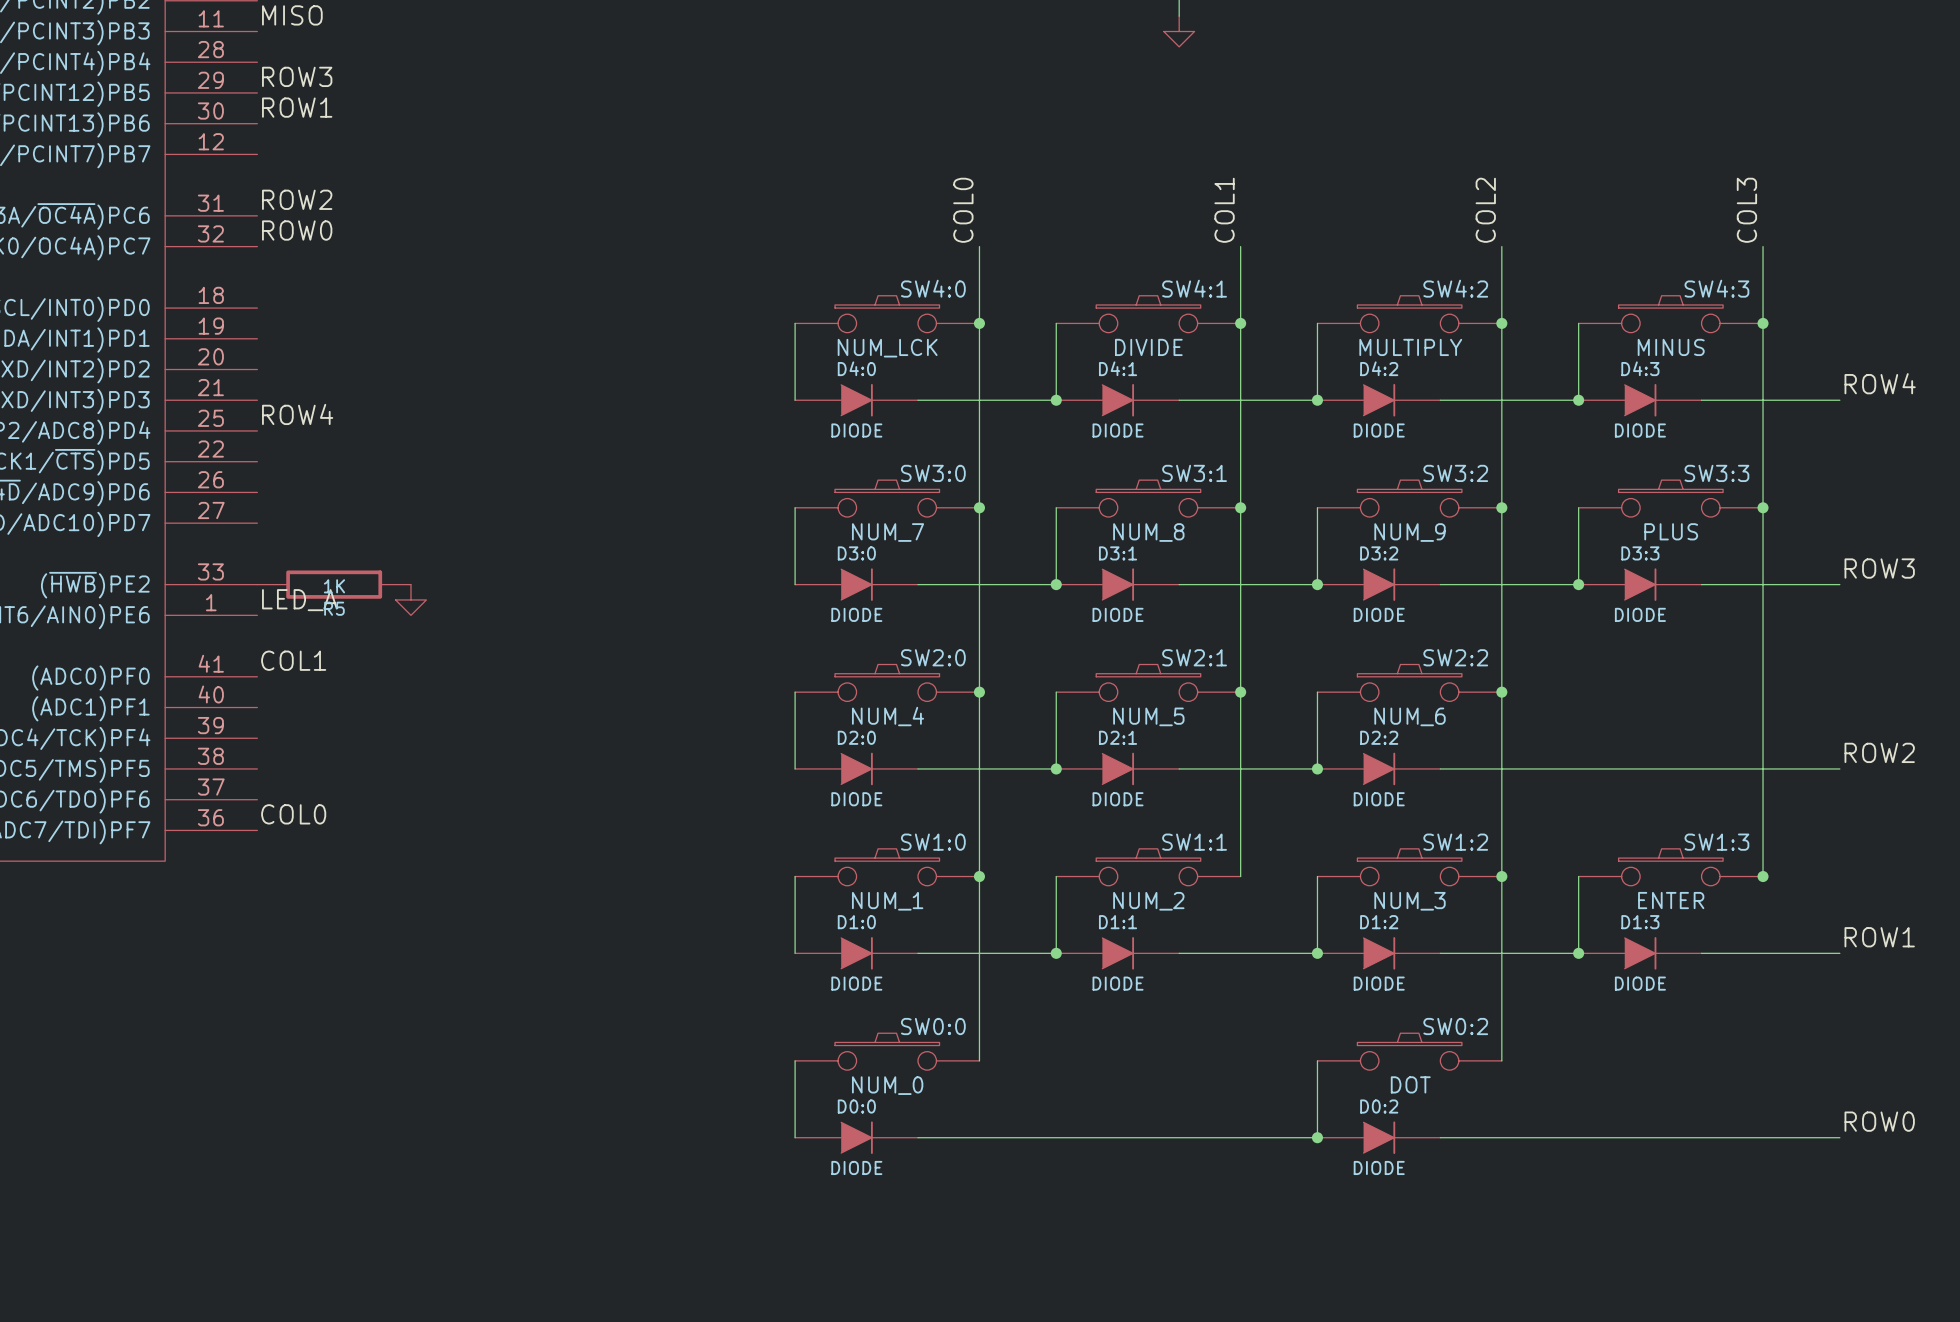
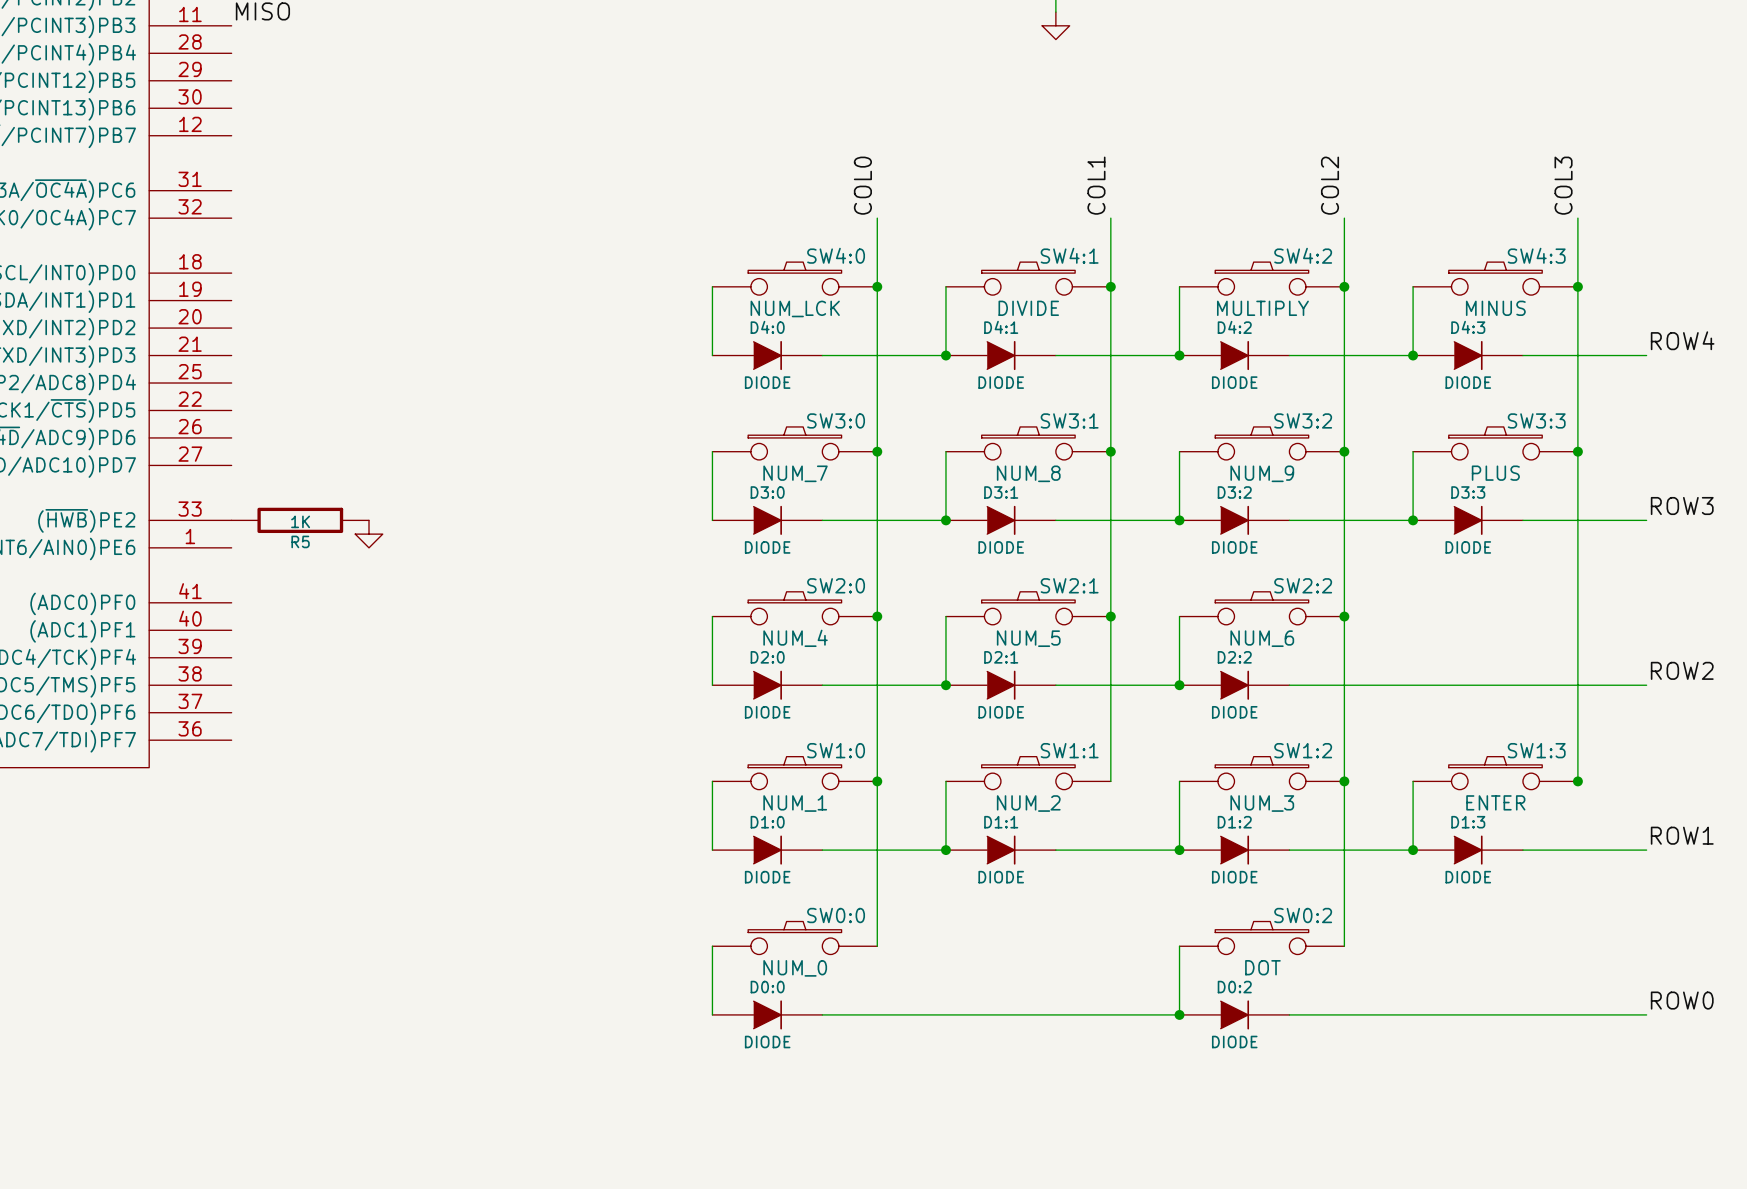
label: ROW3 (297, 76) -> none
label: ROW1 (297, 107) -> none
label: ROW2 (297, 199) -> none
label: ROW0 (297, 230) -> none
label: ROW4 (297, 414) -> none
label: LED_A (299, 600) -> none
label: COL1 (293, 660) -> none
label: COL0 (293, 814) -> none

